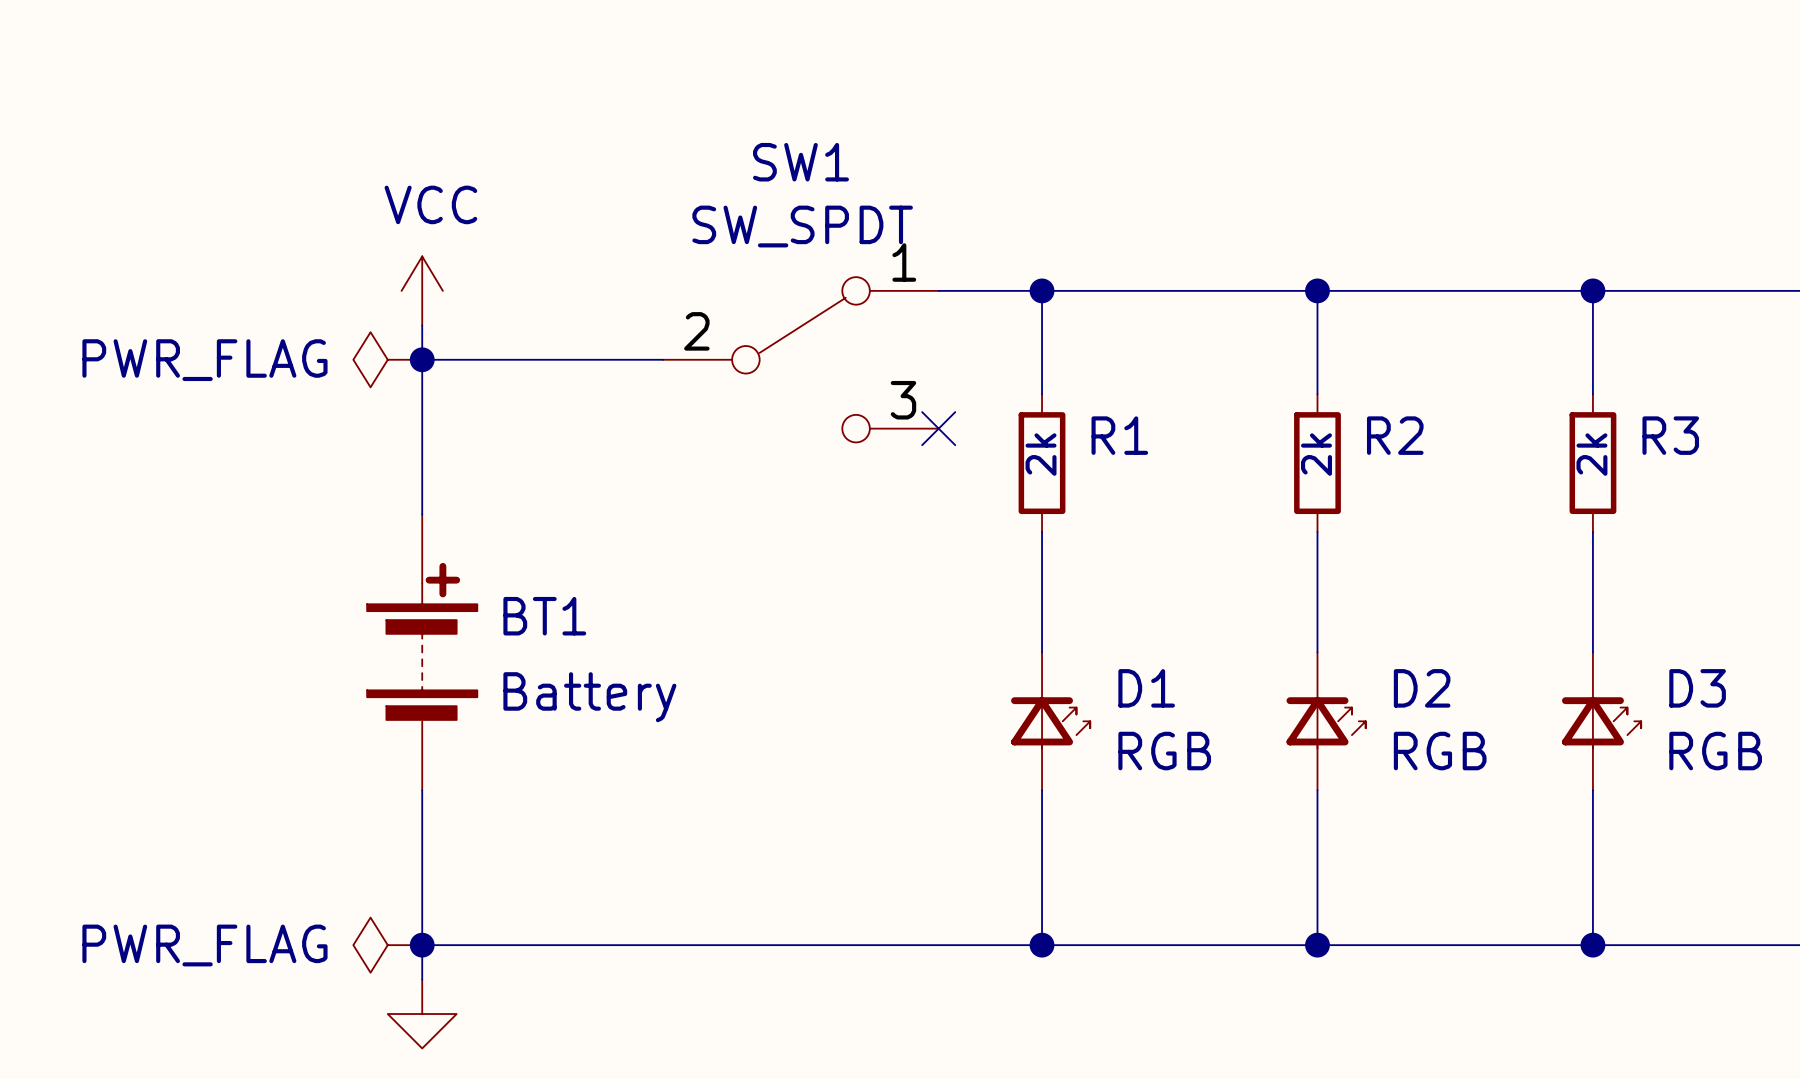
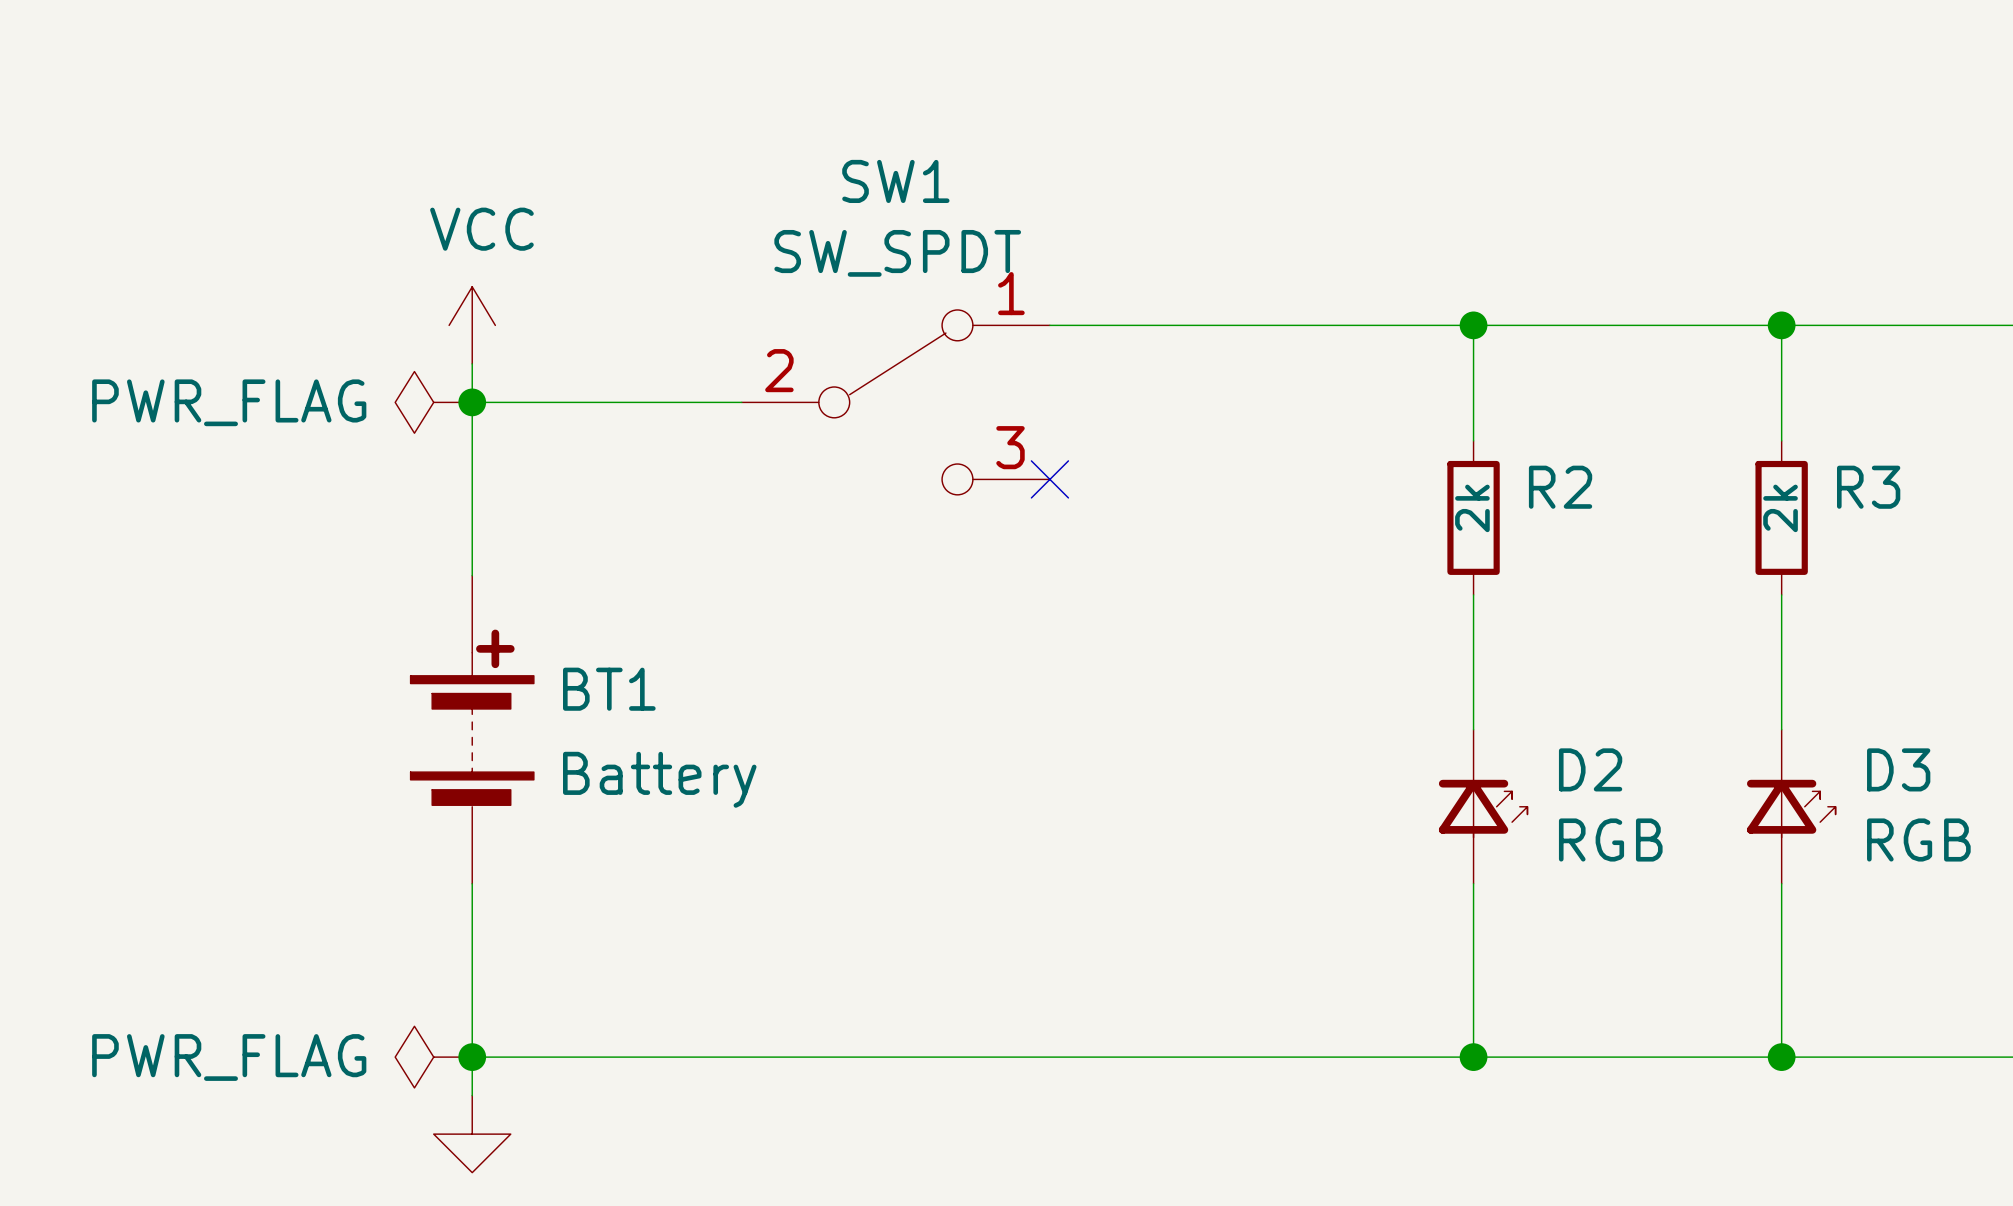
wire: (1042, 290) (1042, 394) -> none
junction: (1042, 290) -> none
R1: 2k (1042, 463) -> none
wire: (1042, 531) (1042, 652) -> none
D1: RGB (1050, 721) -> none
wire: (1042, 790) (1042, 945) -> none
junction: (1042, 945) -> none

